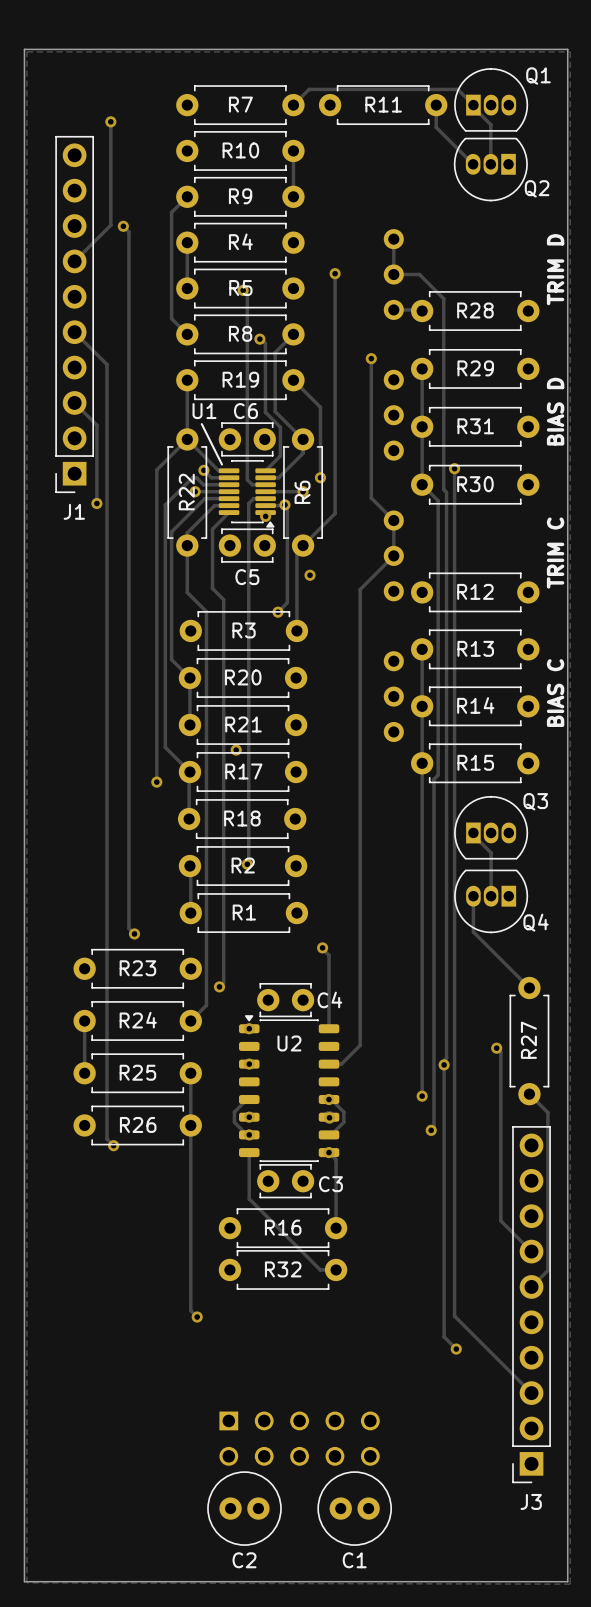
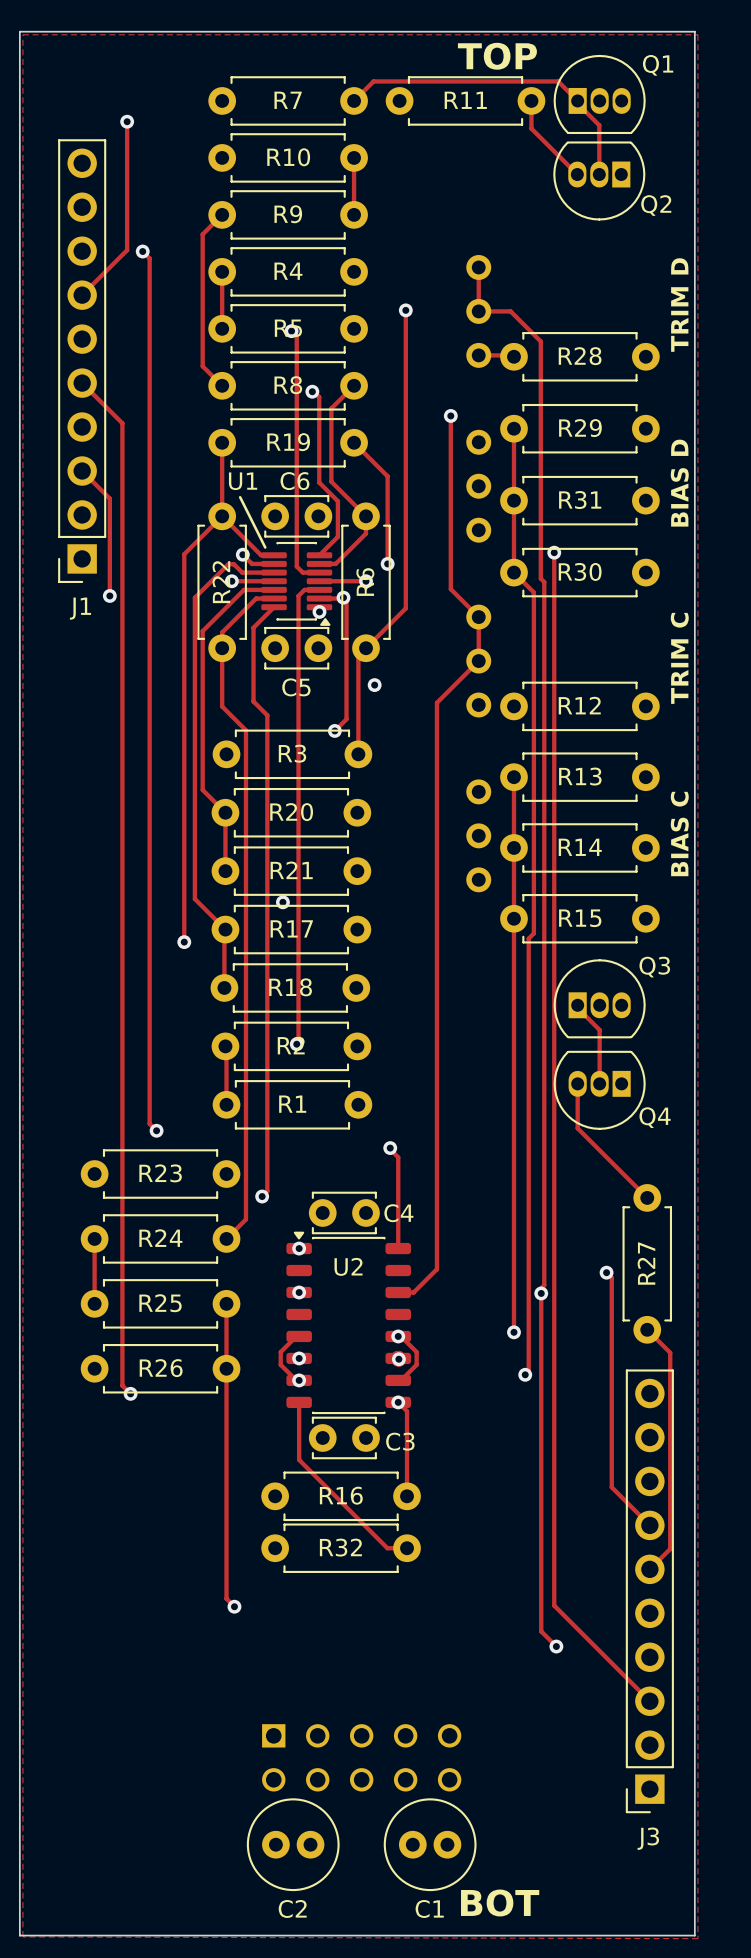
text: none -> TOP (497, 56)
text: none -> BOT (500, 1902)

